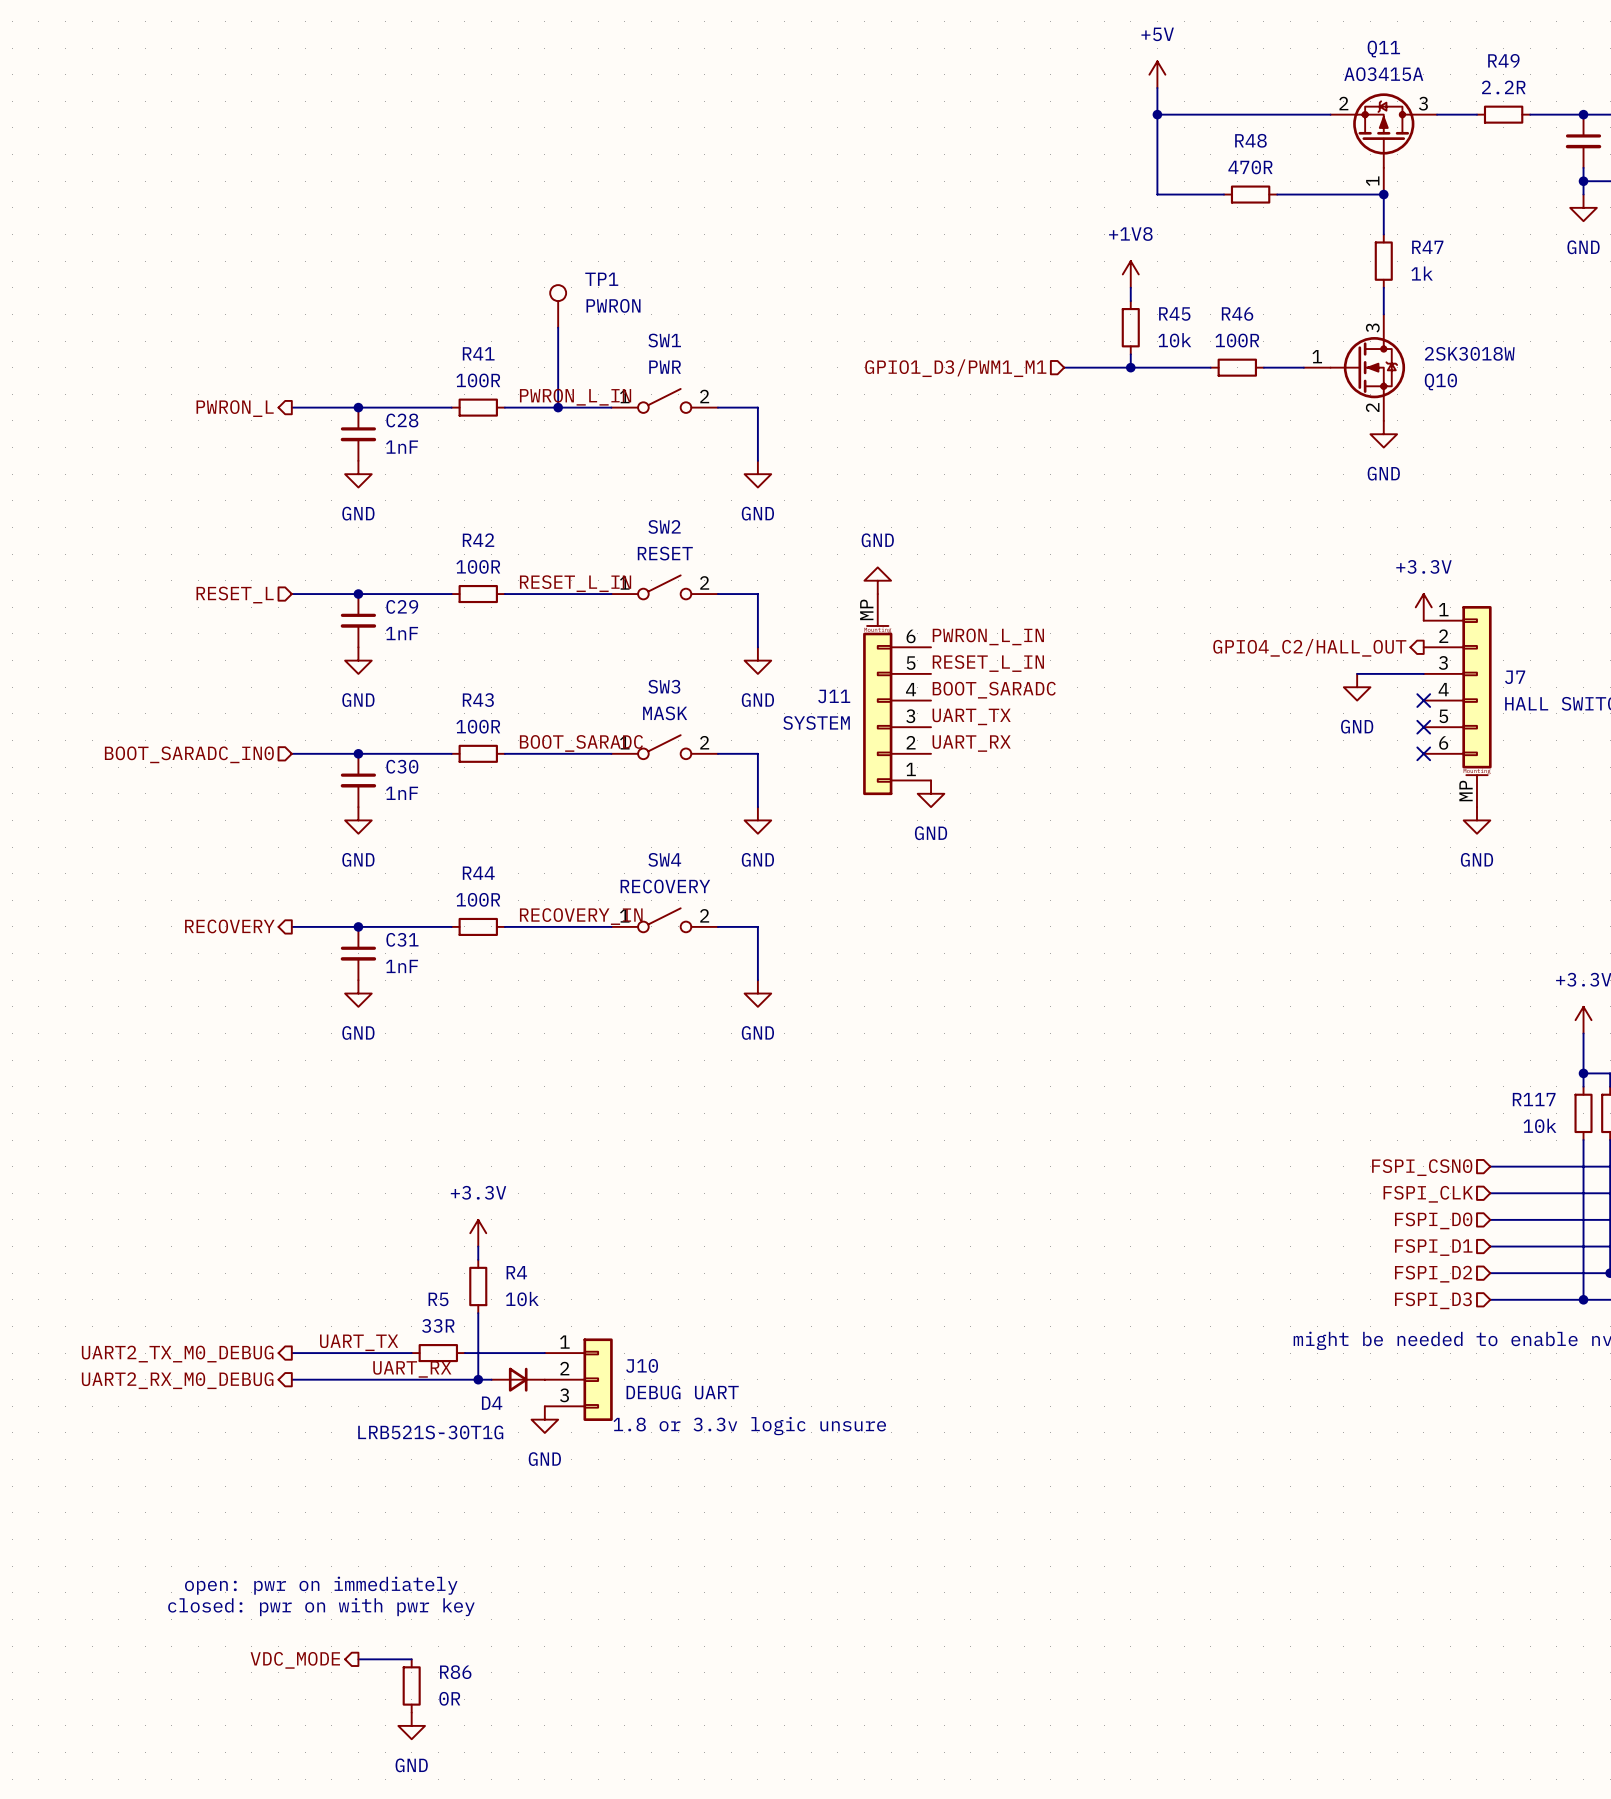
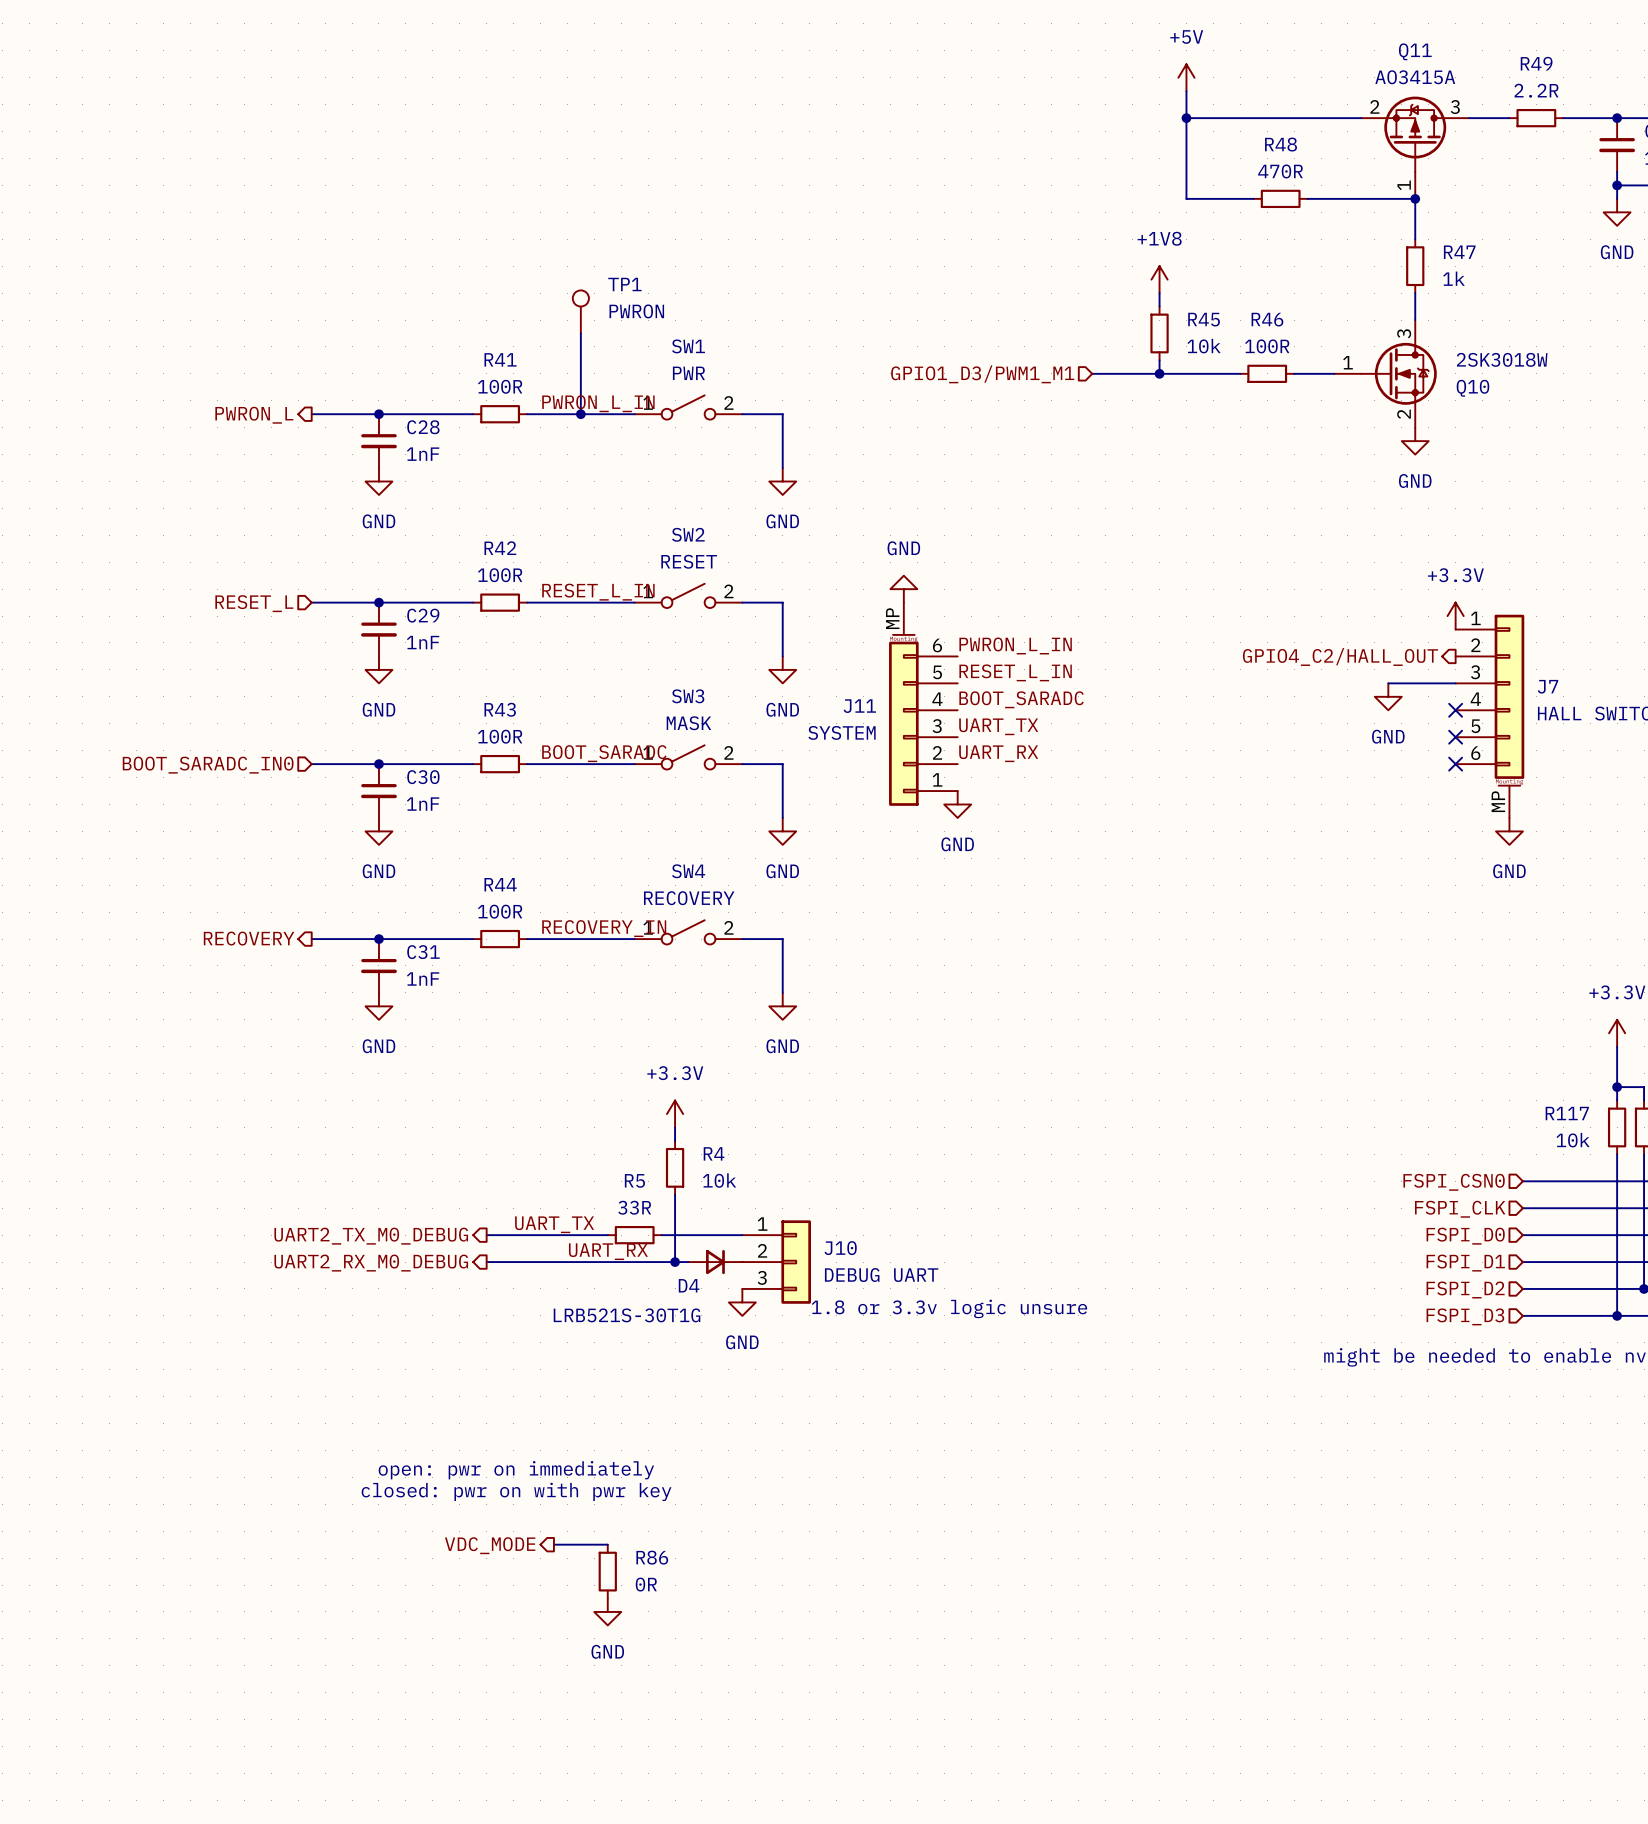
power symbol position: +3.3V (478, 1233) -> +3.3V (675, 1114)
wire: (478, 1246) (478, 1259) -> (675, 1127) (675, 1140)
junction: none -> (675, 1262)
R4 position: (478, 1286) -> (675, 1167)
power symbol: none -> GND (742, 1302)
wire: (478, 1313) (478, 1379) -> (675, 1194) (675, 1262)
label position: UART_TX (359, 1342) -> UART_TX (554, 1224)
wire: (291, 1353) (411, 1353) -> (486, 1235) (607, 1235)
R5 position: (438, 1353) -> (634, 1235)
wire: (464, 1353) (544, 1353) -> (661, 1235) (742, 1235)
hierarchical label position: UART2_TX_M0_DEBUG (177, 1354) -> UART2_TX_M0_DEBUG (371, 1236)
label position: UART_RX (412, 1369) -> UART_RX (608, 1251)
wire: (291, 1379) (491, 1379) -> (486, 1262) (688, 1262)
junction: (478, 1379) -> none
D4 position: (518, 1379) -> (715, 1262)
J10 position: (578, 1379) -> (776, 1262)
hierarchical label position: UART2_RX_M0_DEBUG (177, 1380) -> UART2_RX_M0_DEBUG (371, 1263)
power symbol: GND (544, 1419) -> none
text position: 1.8 or 3.3v logic unsure (749, 1426) -> 1.8 or 3.3v logic unsure (949, 1308)
text position: open: pwr on immediately (321, 1585) -> open: pwr on immediately (516, 1470)
power symbol: none -> GND (607, 1611)
text position: closed: pwr on with pwr key (321, 1607) -> closed: pwr on with pwr key (516, 1491)
wire: (358, 1659) (411, 1659) -> (553, 1544) (607, 1544)
hierarchical label position: VDC_MODE (295, 1660) -> VDC_MODE (490, 1545)
R86 position: (411, 1685) -> (607, 1571)
power symbol: GND (411, 1725) -> none

